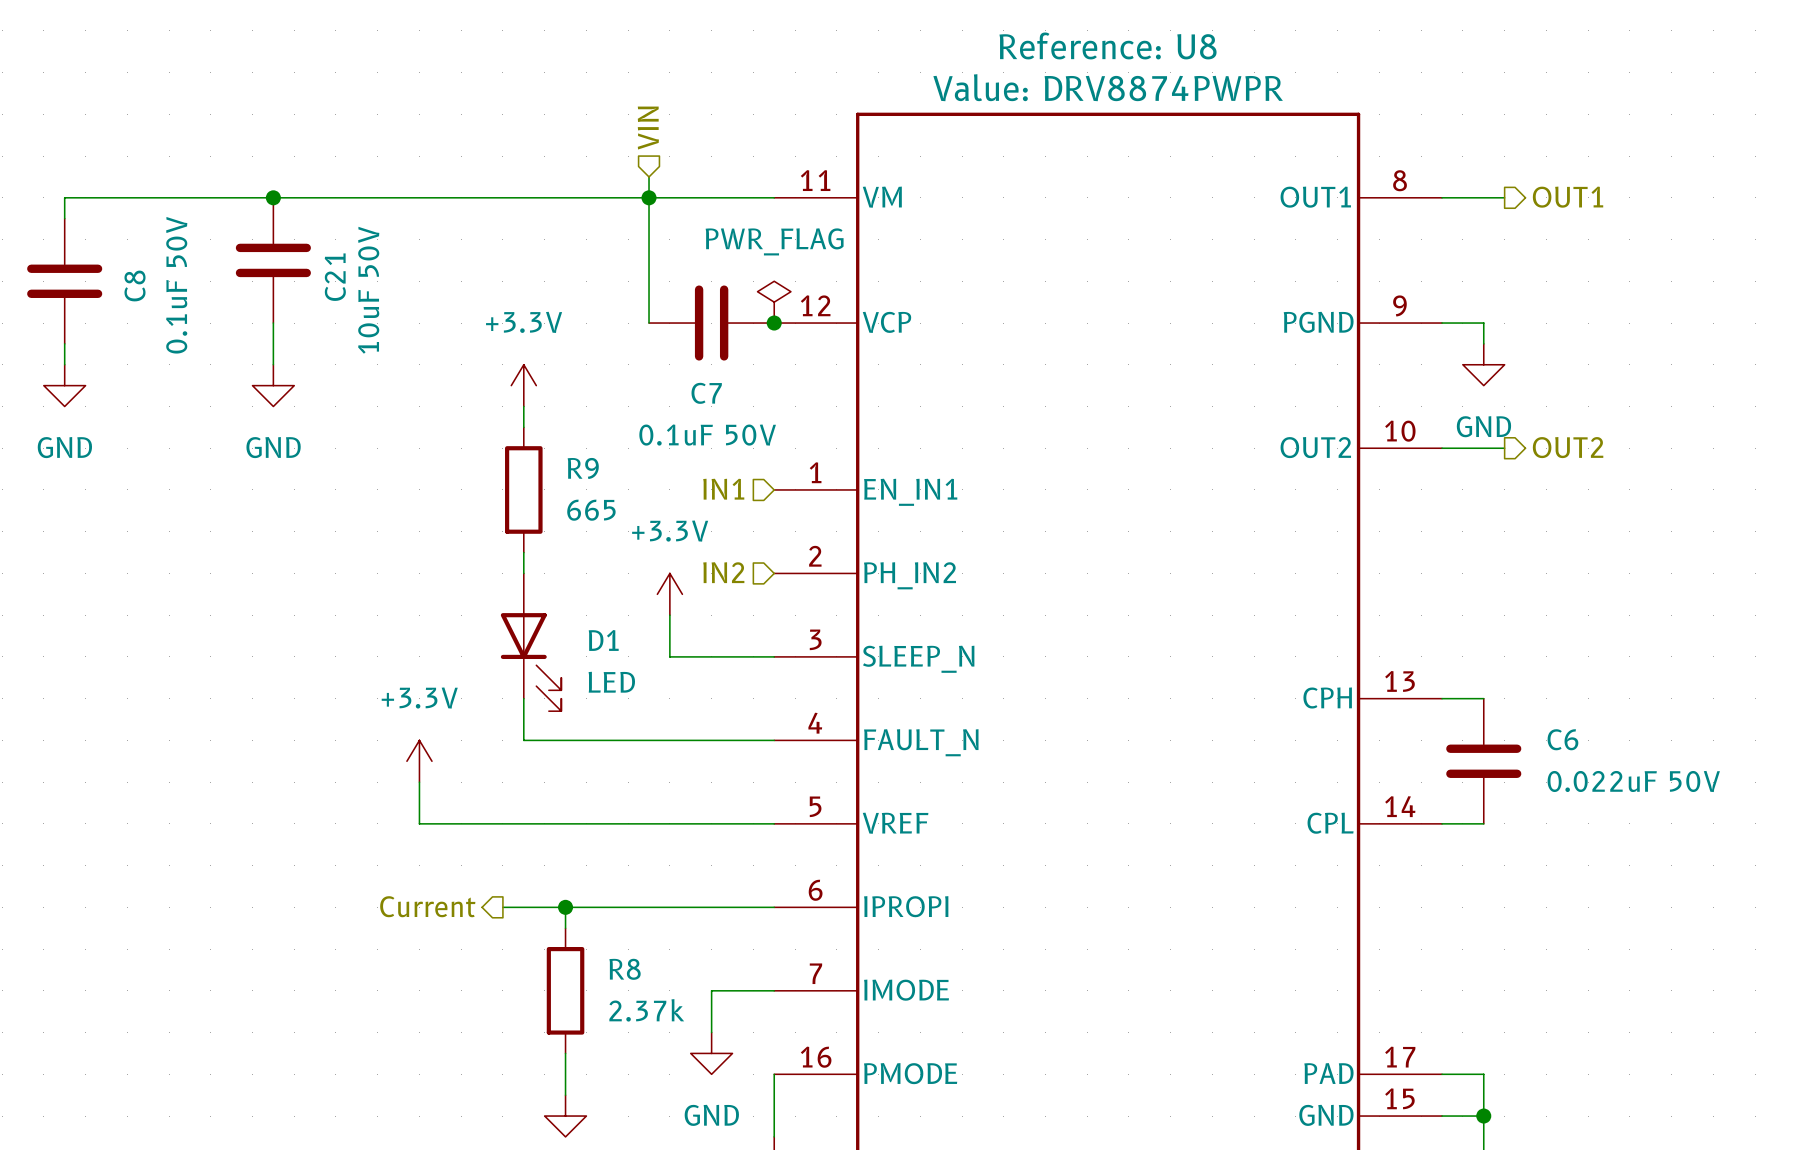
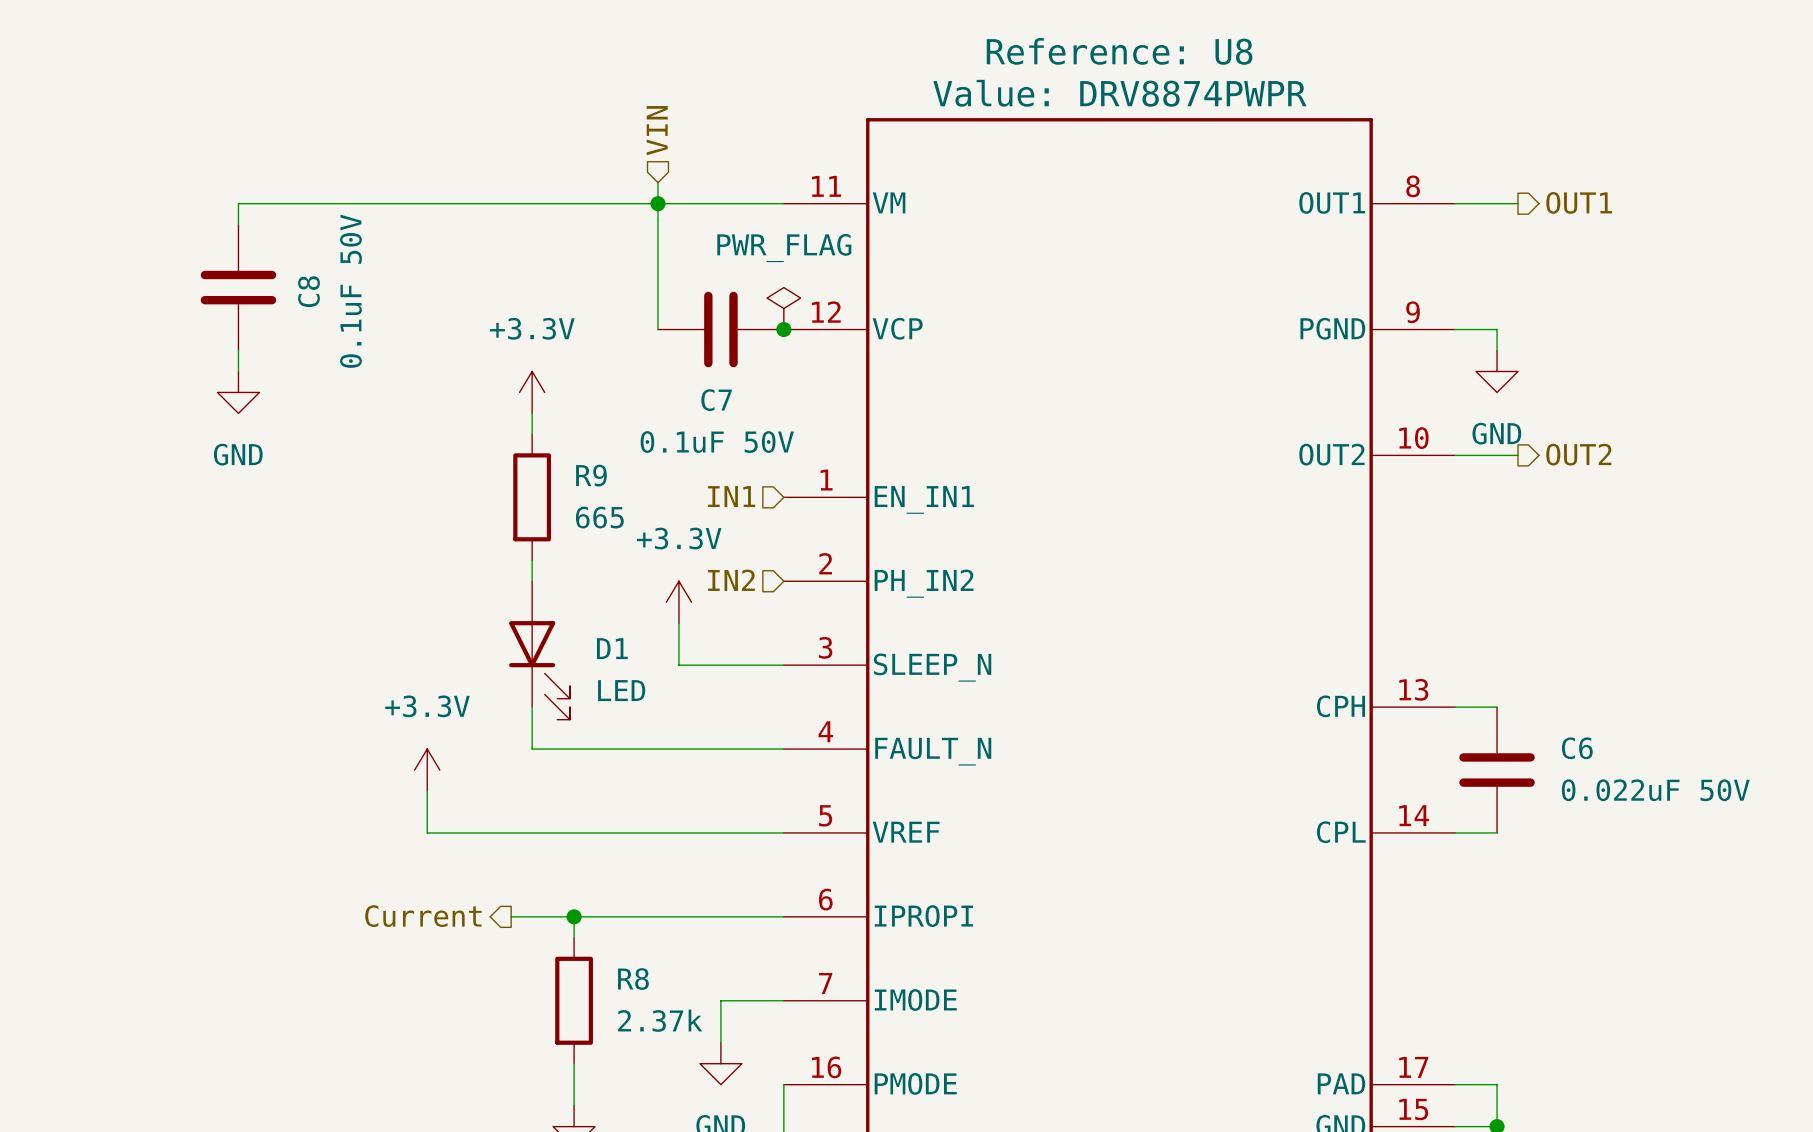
wire: (231, 197) (64, 197) (64, 218) -> (238, 203) (238, 224)
junction: (273, 197) -> none
C21: 10uF 50V (273, 260) -> none
C8 position: (64, 281) -> (238, 287)
wire: (273, 323) (273, 364) -> none
wire: (64, 343) (64, 364) -> (238, 350) (238, 371)
power symbol: GND (64, 385) -> none
power symbol position: GND (273, 385) -> GND (238, 392)

